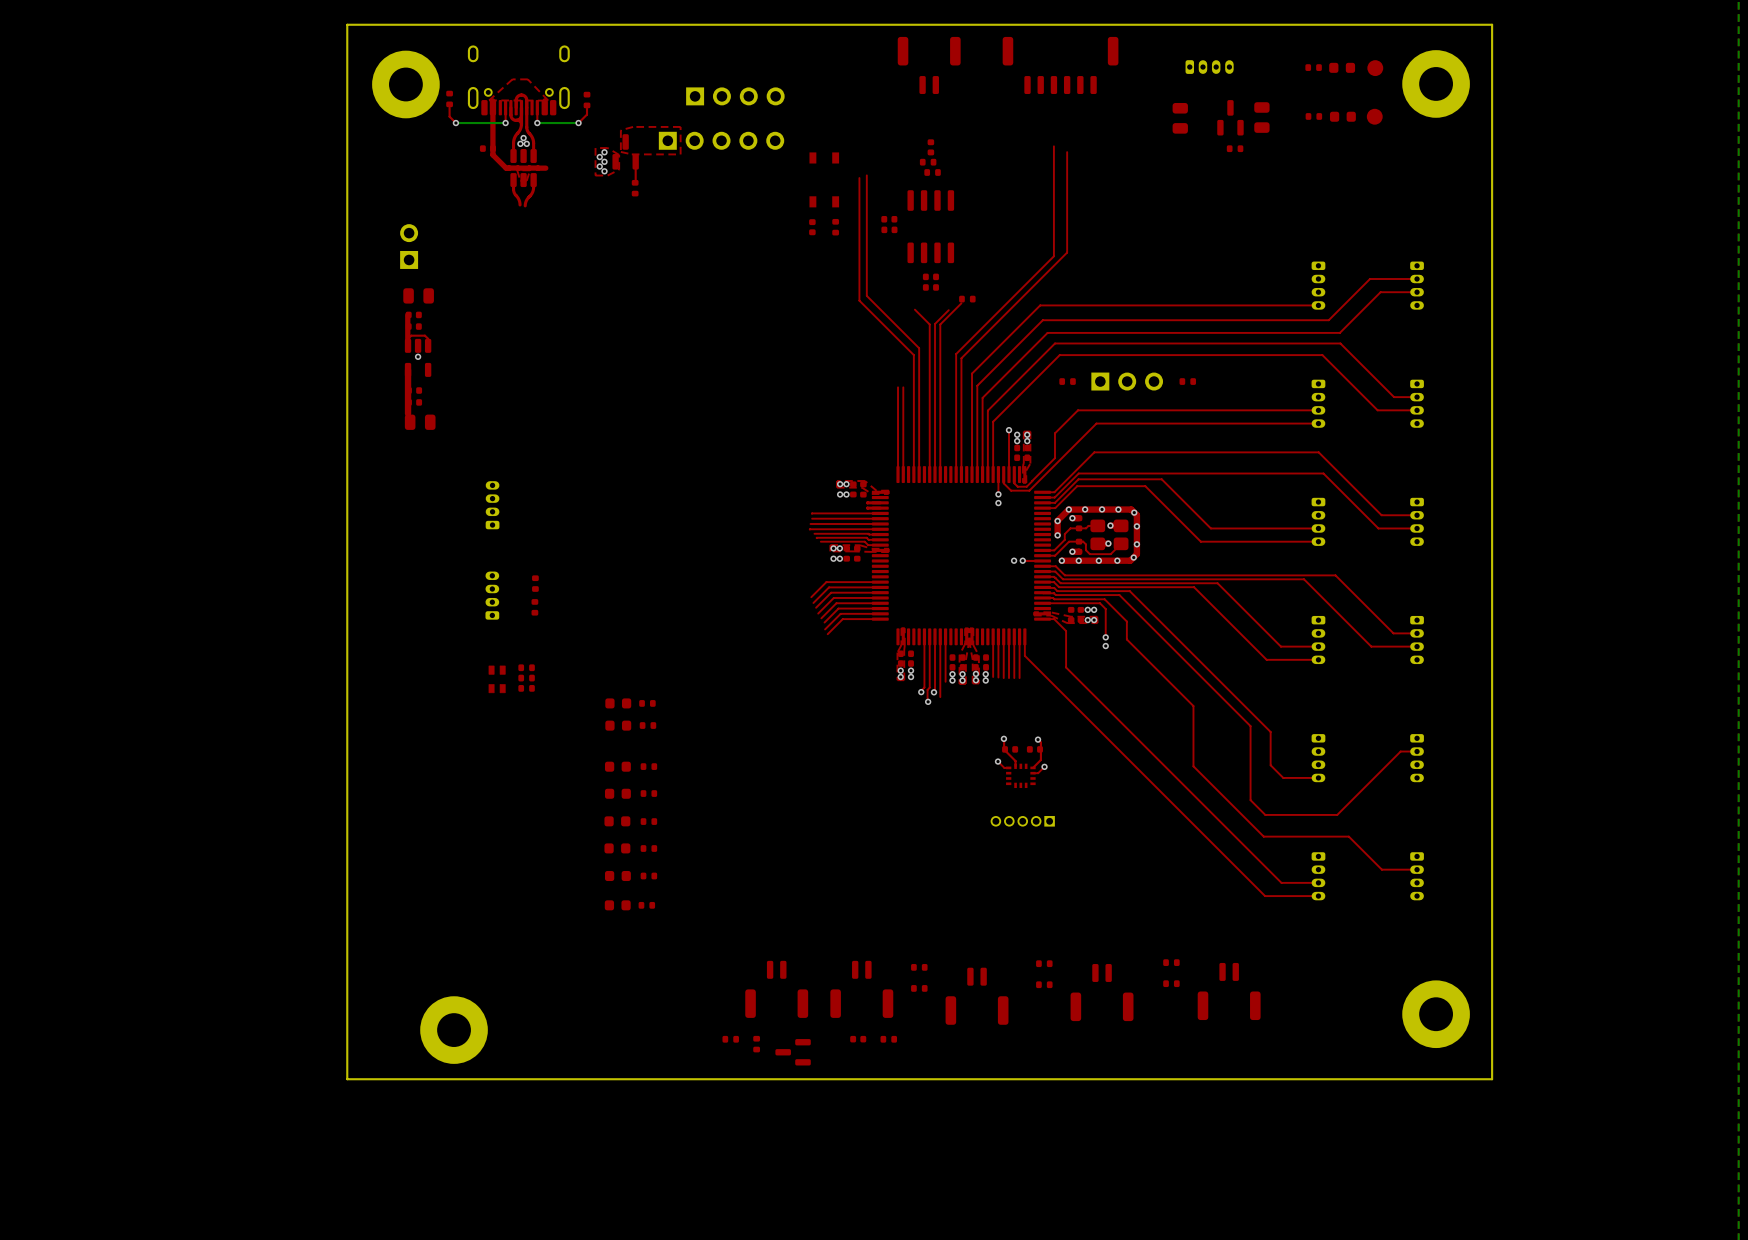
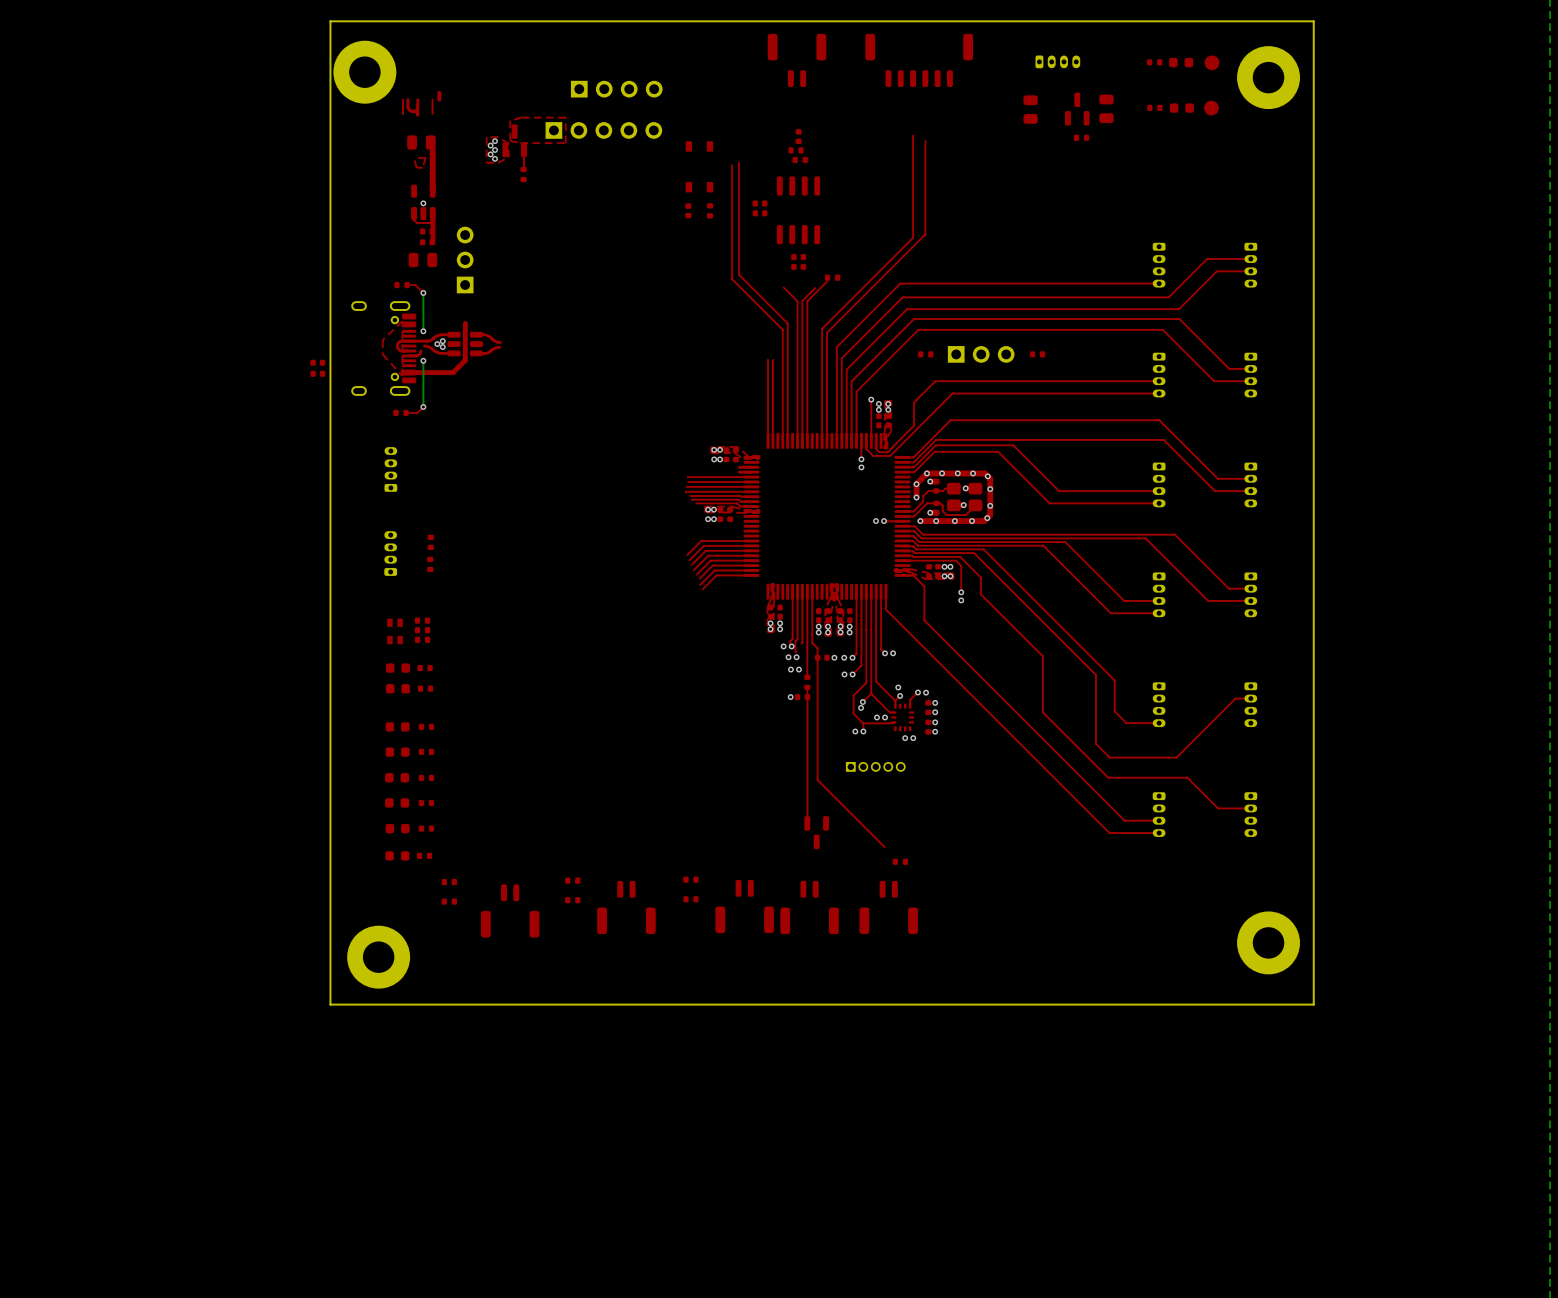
board edge: (1492, 24) (347, 24) (347, 1079) (1492, 1079) (1492, 24) -> (1313, 21) (1313, 1004) (330, 1004) (330, 21) (1313, 21)
top zone outline: (527, 79) (548, 100) (489, 100) (512, 79) (527, 79) -> none
part: (518, 80) -> none
part position: (405, 84) -> (364, 72)
part: (449, 98) -> none
top track: (492, 100) (492, 154) (506, 168) (545, 168) -> none
part: (587, 100) -> none
top track: (449, 107) (449, 116) (455, 123) -> none
top track: (516, 107) (517, 97) (520, 95) (524, 96) (526, 99) (526, 128) (533, 139) (533, 156) -> none
top track: (587, 108) (587, 114) (578, 123) -> none
via: (455, 123) -> none
bottom track: (505, 123) (455, 123) -> none
via: (505, 123) -> none
via: (537, 123) -> none
bottom track: (578, 123) (537, 123) -> none
via: (578, 123) -> none
top track: (521, 124) (514, 139) (513, 156) -> none
via: (523, 138) -> none
via: (520, 143) -> none
via: (526, 143) -> none
part: (487, 148) -> none
part: none -> (421, 142)
part rotation: 0° (523, 168) -> 90° clockwise (465, 344)
part position: (523, 168) -> (465, 344)
top track: (513, 180) (513, 191) (520, 204) -> none
top track: (533, 180) (533, 190) (525, 205) -> none
via: none -> (423, 203)
top track: none -> (414, 213) (414, 220) (416, 223) (429, 223) (432, 220) (432, 213) (432, 242)
part: (409, 246) -> none
part: none -> (427, 231)
part: none -> (427, 242)
part: none -> (422, 260)
part: none -> (465, 260)
part: (418, 295) -> none
part: none -> (401, 285)
top track: none -> (410, 285) (415, 285) (423, 292)
top track: (407, 314) (407, 345) (408, 338) (411, 335) (424, 335) (428, 338) (428, 345) -> none
part: (413, 314) -> none
bottom track: none -> (423, 292) (423, 331)
via: none -> (423, 292)
part: (413, 326) -> none
top zone outline: none -> (402, 321) (382, 340) (382, 354) (402, 376) (402, 321)
top track: none -> (465, 323) (465, 330)
via: (418, 356) -> none
via: none -> (423, 331)
top track: none -> (465, 330) (465, 338)
part rotation: 0° (418, 357) -> 180° (423, 202)
part position: (418, 357) -> (423, 202)
top track: none -> (454, 334) (439, 335) (428, 341) (401, 341) (398, 342) (399, 349) (409, 350)
top track: none -> (476, 334) (486, 335) (500, 342)
top track: none -> (465, 338) (465, 349)
via: none -> (442, 341)
top track: (408, 369) (408, 413) -> (432, 150) (432, 191)
via: none -> (437, 344)
top track: none -> (424, 346) (438, 352) (454, 353)
via: none -> (442, 347)
top track: none -> (499, 347) (487, 353) (476, 353)
part: none -> (383, 348)
top track: none -> (465, 349) (465, 357)
top track: none -> (420, 350) (418, 355) (409, 355)
top track: none -> (465, 357) (465, 360) (453, 372) (402, 372)
bottom track: none -> (423, 360) (423, 407)
via: none -> (423, 360)
part: (420, 422) -> none
top track: none -> (423, 407) (417, 412) (409, 412)
via: none -> (423, 407)
part: none -> (401, 412)
top track: none -> (856, 629) (856, 653) (852, 657)
top track: none -> (861, 629) (861, 665) (852, 674)
top track: none -> (866, 630) (866, 682) (853, 695) (853, 713) (863, 723) (863, 731)
top track: none -> (871, 630) (871, 693)
top track: none -> (876, 630) (876, 681) (895, 700)
top track: none -> (881, 630) (881, 649) (885, 653)
top track: none -> (812, 633) (812, 643) (817, 648) (817, 780) (884, 847)
via: (921, 692) -> none
via: (934, 692) -> none
via: none -> (783, 646)
via: none -> (791, 646)
top track: none -> (807, 647) (807, 677)
via: (928, 701) -> none
via: none -> (885, 653)
via: none -> (893, 653)
part: (618, 703) -> none
part: (647, 703) -> none
via: none -> (788, 657)
via: none -> (796, 657)
part: none -> (822, 657)
via: none -> (834, 657)
via: none -> (844, 657)
via: none -> (852, 657)
part: none -> (397, 668)
part: none -> (425, 668)
via: none -> (790, 669)
via: none -> (799, 669)
part: (618, 725) -> none
part: (647, 725) -> none
via: none -> (844, 674)
via: none -> (852, 674)
part: none -> (807, 682)
top track: (1003, 738) (1004, 749) (1015, 761) (1015, 766) -> none
via: (1003, 738) -> none
top track: none -> (807, 687) (807, 823)
top track: (1038, 739) (1040, 742) (1040, 759) (1033, 767) -> none
part: none -> (397, 688)
part: none -> (425, 688)
top track: none -> (917, 692) (910, 700) (910, 706)
via: none -> (917, 692)
via: none -> (926, 692)
top track: none -> (871, 693) (889, 712) (893, 712)
top track: none -> (871, 693) (862, 702)
top track: none -> (900, 695) (895, 700)
via: none -> (900, 695)
via: none -> (790, 697)
part: none -> (802, 697)
part: (1010, 749) -> none
part: (1034, 749) -> none
top track: none -> (895, 700) (895, 706)
via: none -> (862, 702)
via: none -> (935, 702)
top track: (998, 761) (1004, 767) (1008, 767) -> none
part: none -> (928, 707)
part: (617, 766) -> none
part: (648, 766) -> none
top track: (1044, 766) (1038, 773) (1033, 773) -> none
via: (1044, 766) -> none
via: none -> (935, 712)
via: none -> (876, 717)
via: none -> (885, 717)
part rotation: 0° (1020, 775) -> 90° clockwise (902, 717)
part position: (1020, 775) -> (902, 717)
top track: none -> (893, 722) (863, 723)
via: none -> (935, 722)
part: none -> (426, 726)
part: none -> (397, 726)
part: none -> (928, 727)
via: none -> (855, 731)
via: none -> (863, 731)
via: none -> (935, 731)
part: (617, 793) -> none
part: (648, 793) -> none
via: none -> (905, 738)
via: none -> (913, 738)
part: none -> (426, 751)
part: none -> (397, 752)
part: (617, 821) -> none
part: (648, 821) -> none
part rotation: 0° (1022, 821) -> 180° (875, 766)
part: none -> (397, 777)
part: none -> (426, 777)
part: (617, 848) -> none
part: (648, 848) -> none
part: none -> (397, 802)
part: none -> (426, 803)
part: (617, 876) -> none
part: (648, 876) -> none
part: none -> (397, 828)
part: none -> (426, 828)
part: (617, 905) -> none
part: (646, 905) -> none
part: none -> (397, 855)
part: none -> (424, 855)
part: none -> (900, 861)
part: none -> (690, 879)
part: none -> (572, 880)
part: none -> (449, 882)
part: (1171, 962) -> none
part: (1044, 963) -> none
part: none -> (690, 899)
part: (919, 967) -> none
part: none -> (572, 900)
part: none -> (449, 901)
part: none -> (809, 907)
part: none -> (888, 907)
part: none -> (510, 910)
part: (1171, 983) -> none
part: (1044, 984) -> none
part: (919, 988) -> none
part position: (776, 989) -> (626, 907)
part position: (861, 989) -> (744, 906)
part: (1229, 991) -> none
part: (1102, 992) -> none
part: (977, 996) -> none
part position: (454, 1030) -> (378, 957)
part: (730, 1039) -> none
part: (858, 1039) -> none
part: (888, 1039) -> none
part: (756, 1044) -> none
part rotation: 0° (793, 1052) -> 90° counterclockwise (816, 832)
part position: (793, 1052) -> (816, 832)

